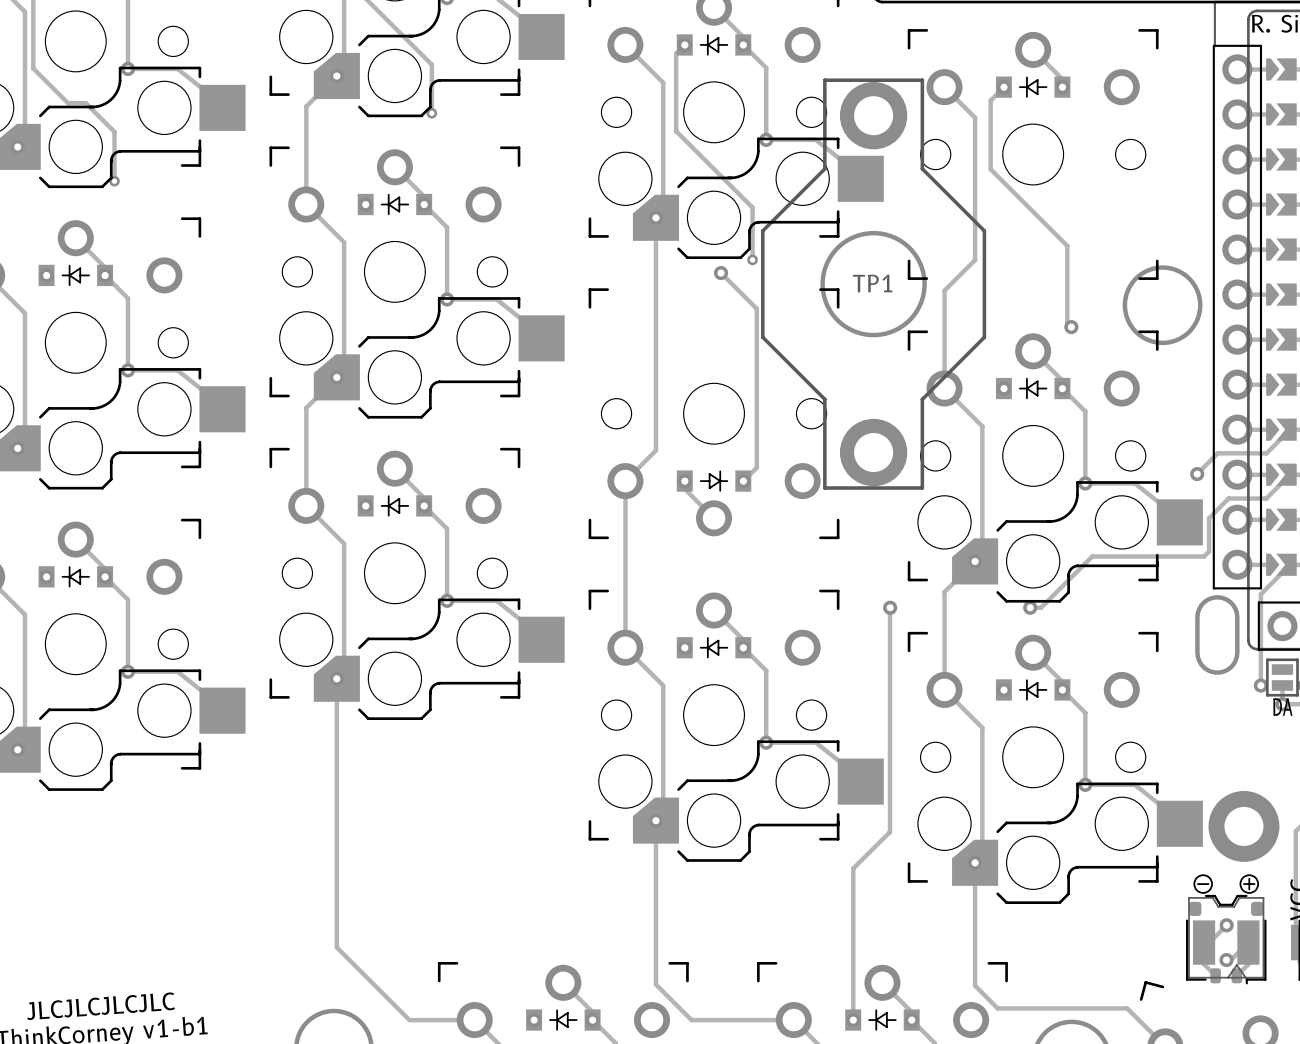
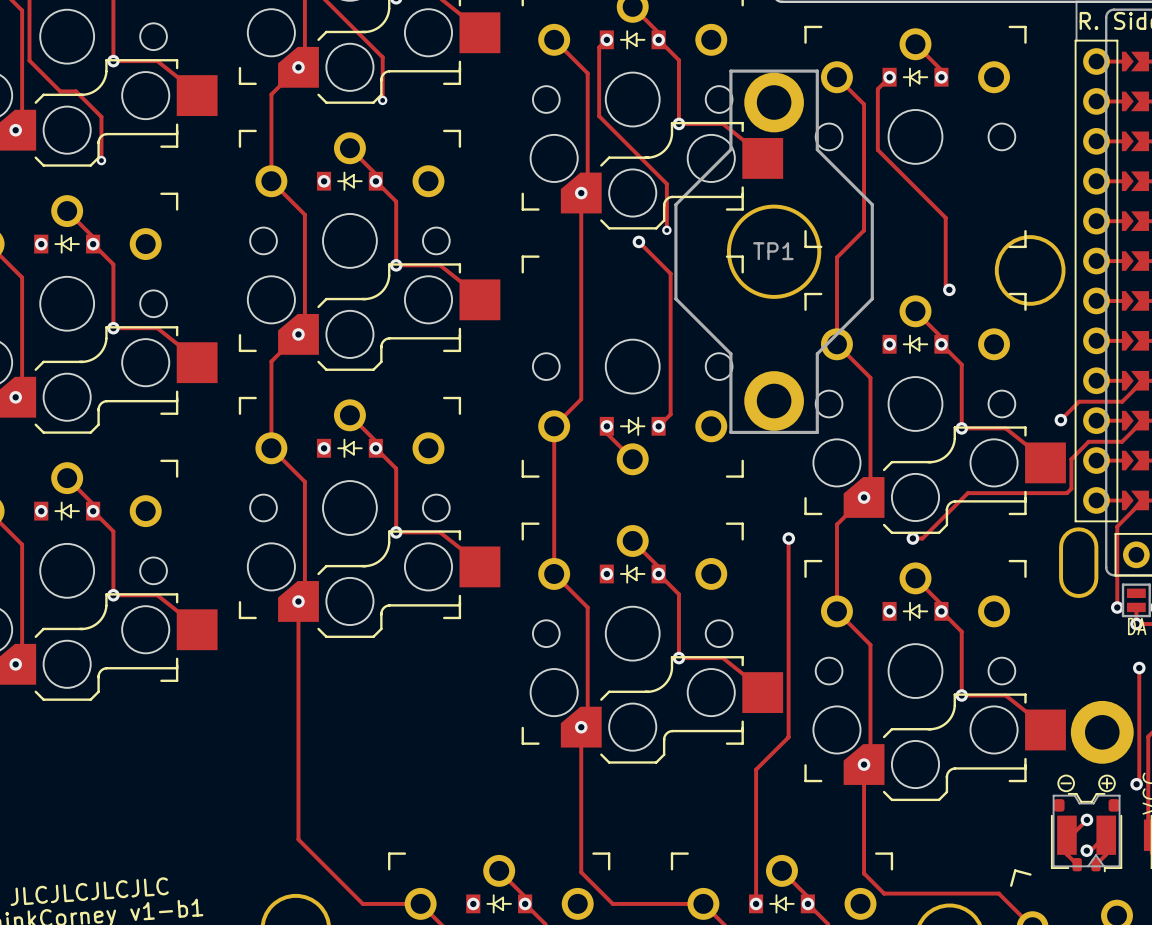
track: none -> (1139, 667) (1139, 781) (1136, 784)
via: none -> (1139, 667)
via: none -> (1136, 784)

